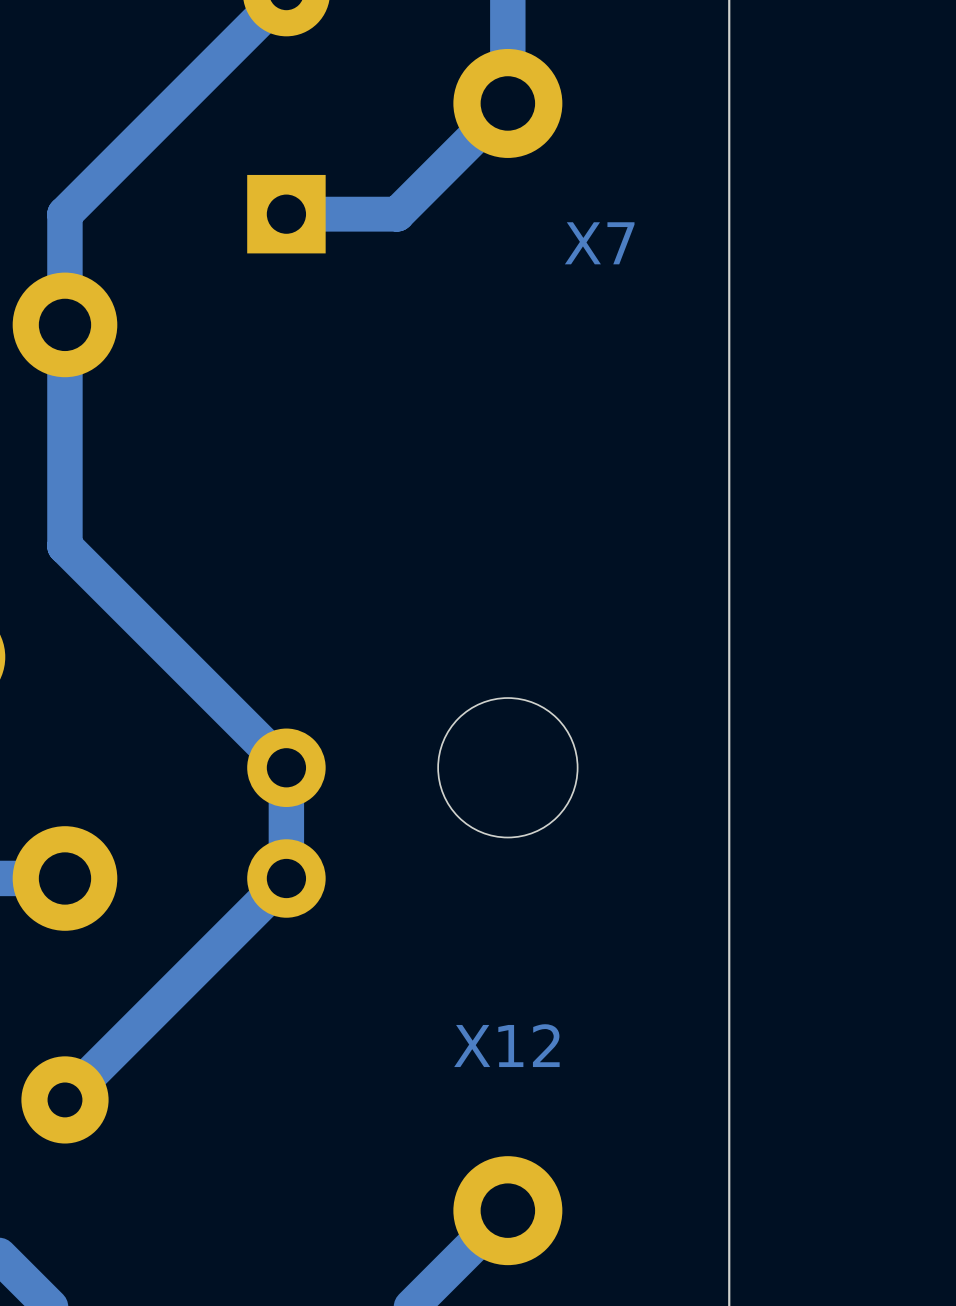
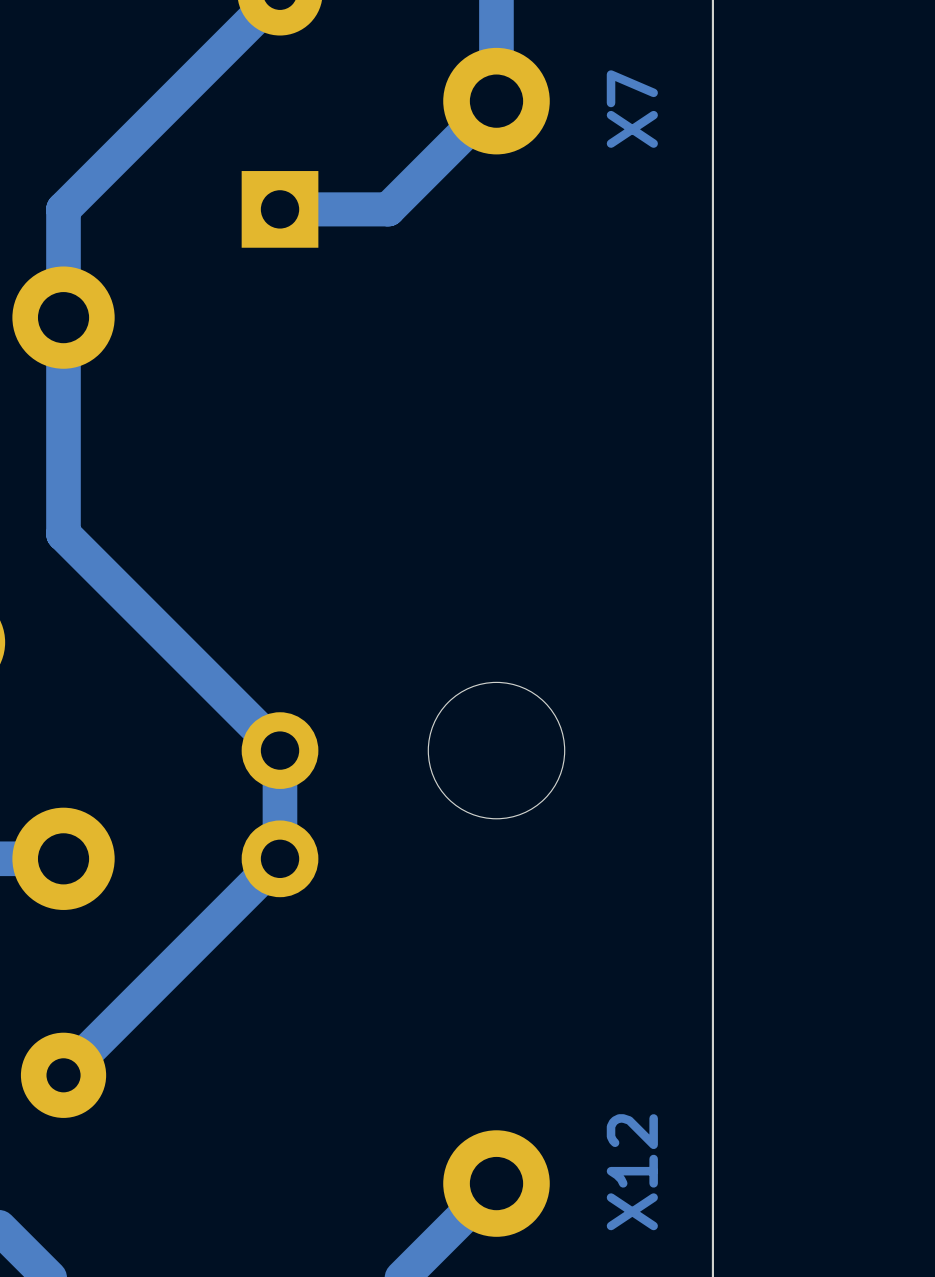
text rotation: 0° (599, 243) -> 90° counterclockwise (632, 109)
text position: X7 (599, 243) -> X7 (632, 109)
text rotation: 0° (506, 1045) -> 90° counterclockwise (632, 1172)
text position: X12 (506, 1045) -> X12 (632, 1172)

